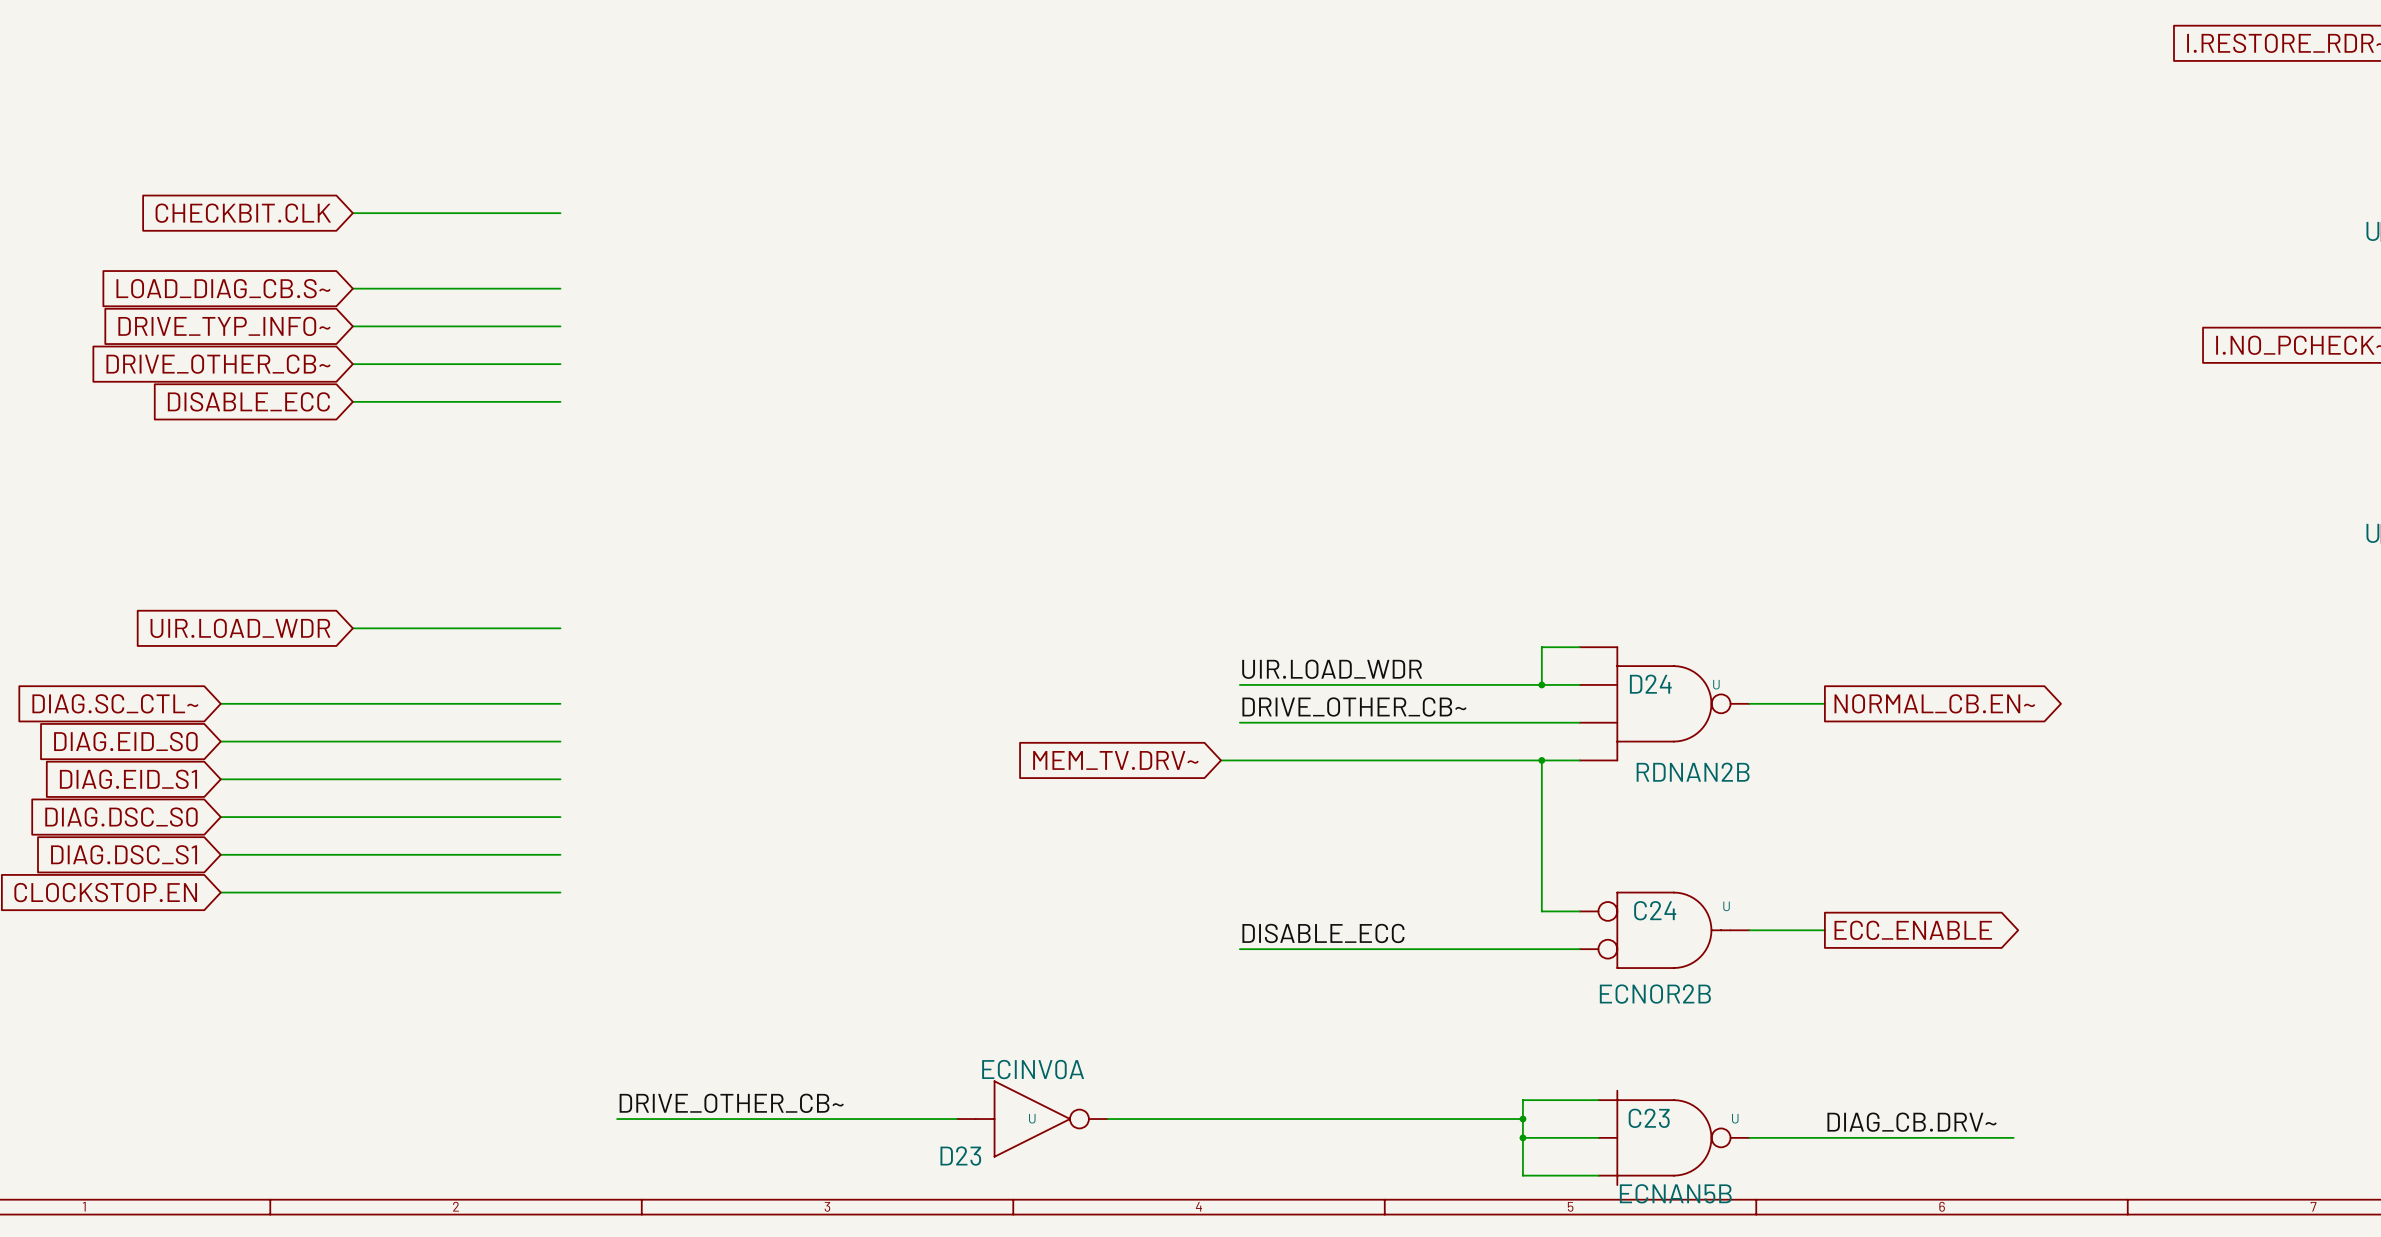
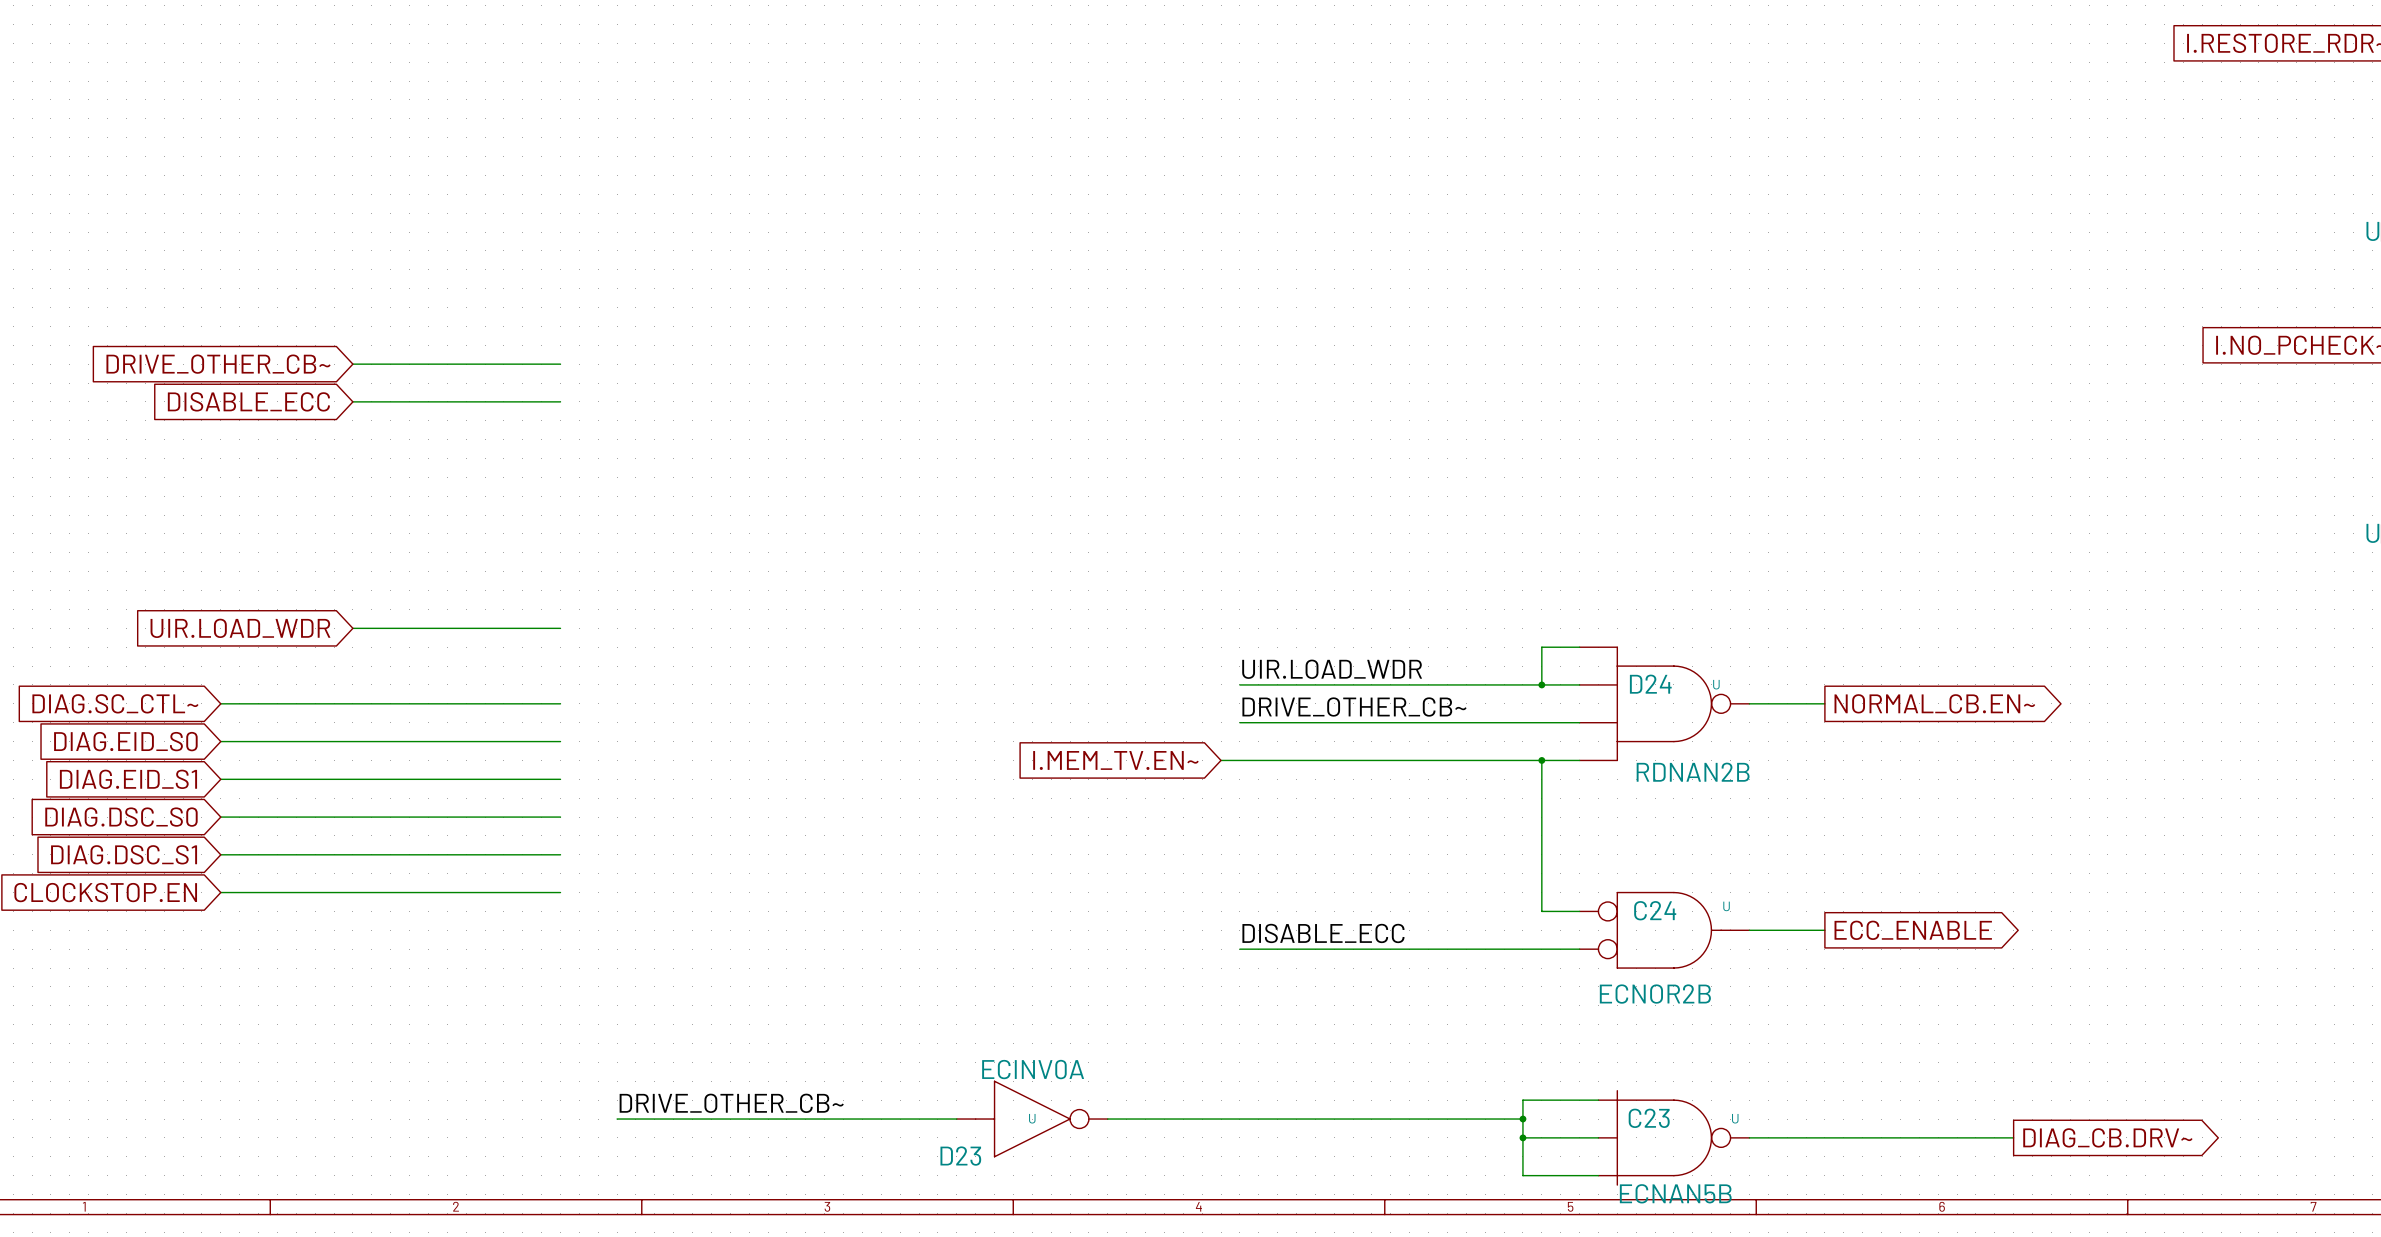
global label: CHECKBIT.CLK (243, 213) -> none
wire: (352, 213) (560, 213) -> none
global label: LOAD_DIAG_CB.S~ (223, 288) -> none
wire: (352, 288) (560, 288) -> none
global label: DRIVE_TYP_INFO~ (224, 326) -> none
wire: (352, 326) (560, 326) -> none
global label: MEM_TV.DRV~ (1115, 760) -> I.MEM_TV.EN~ (1115, 760)
label: DIAG_CB.DRV~ (1912, 1122) -> none
global label: none -> DIAG_CB.DRV~ (2107, 1137)

